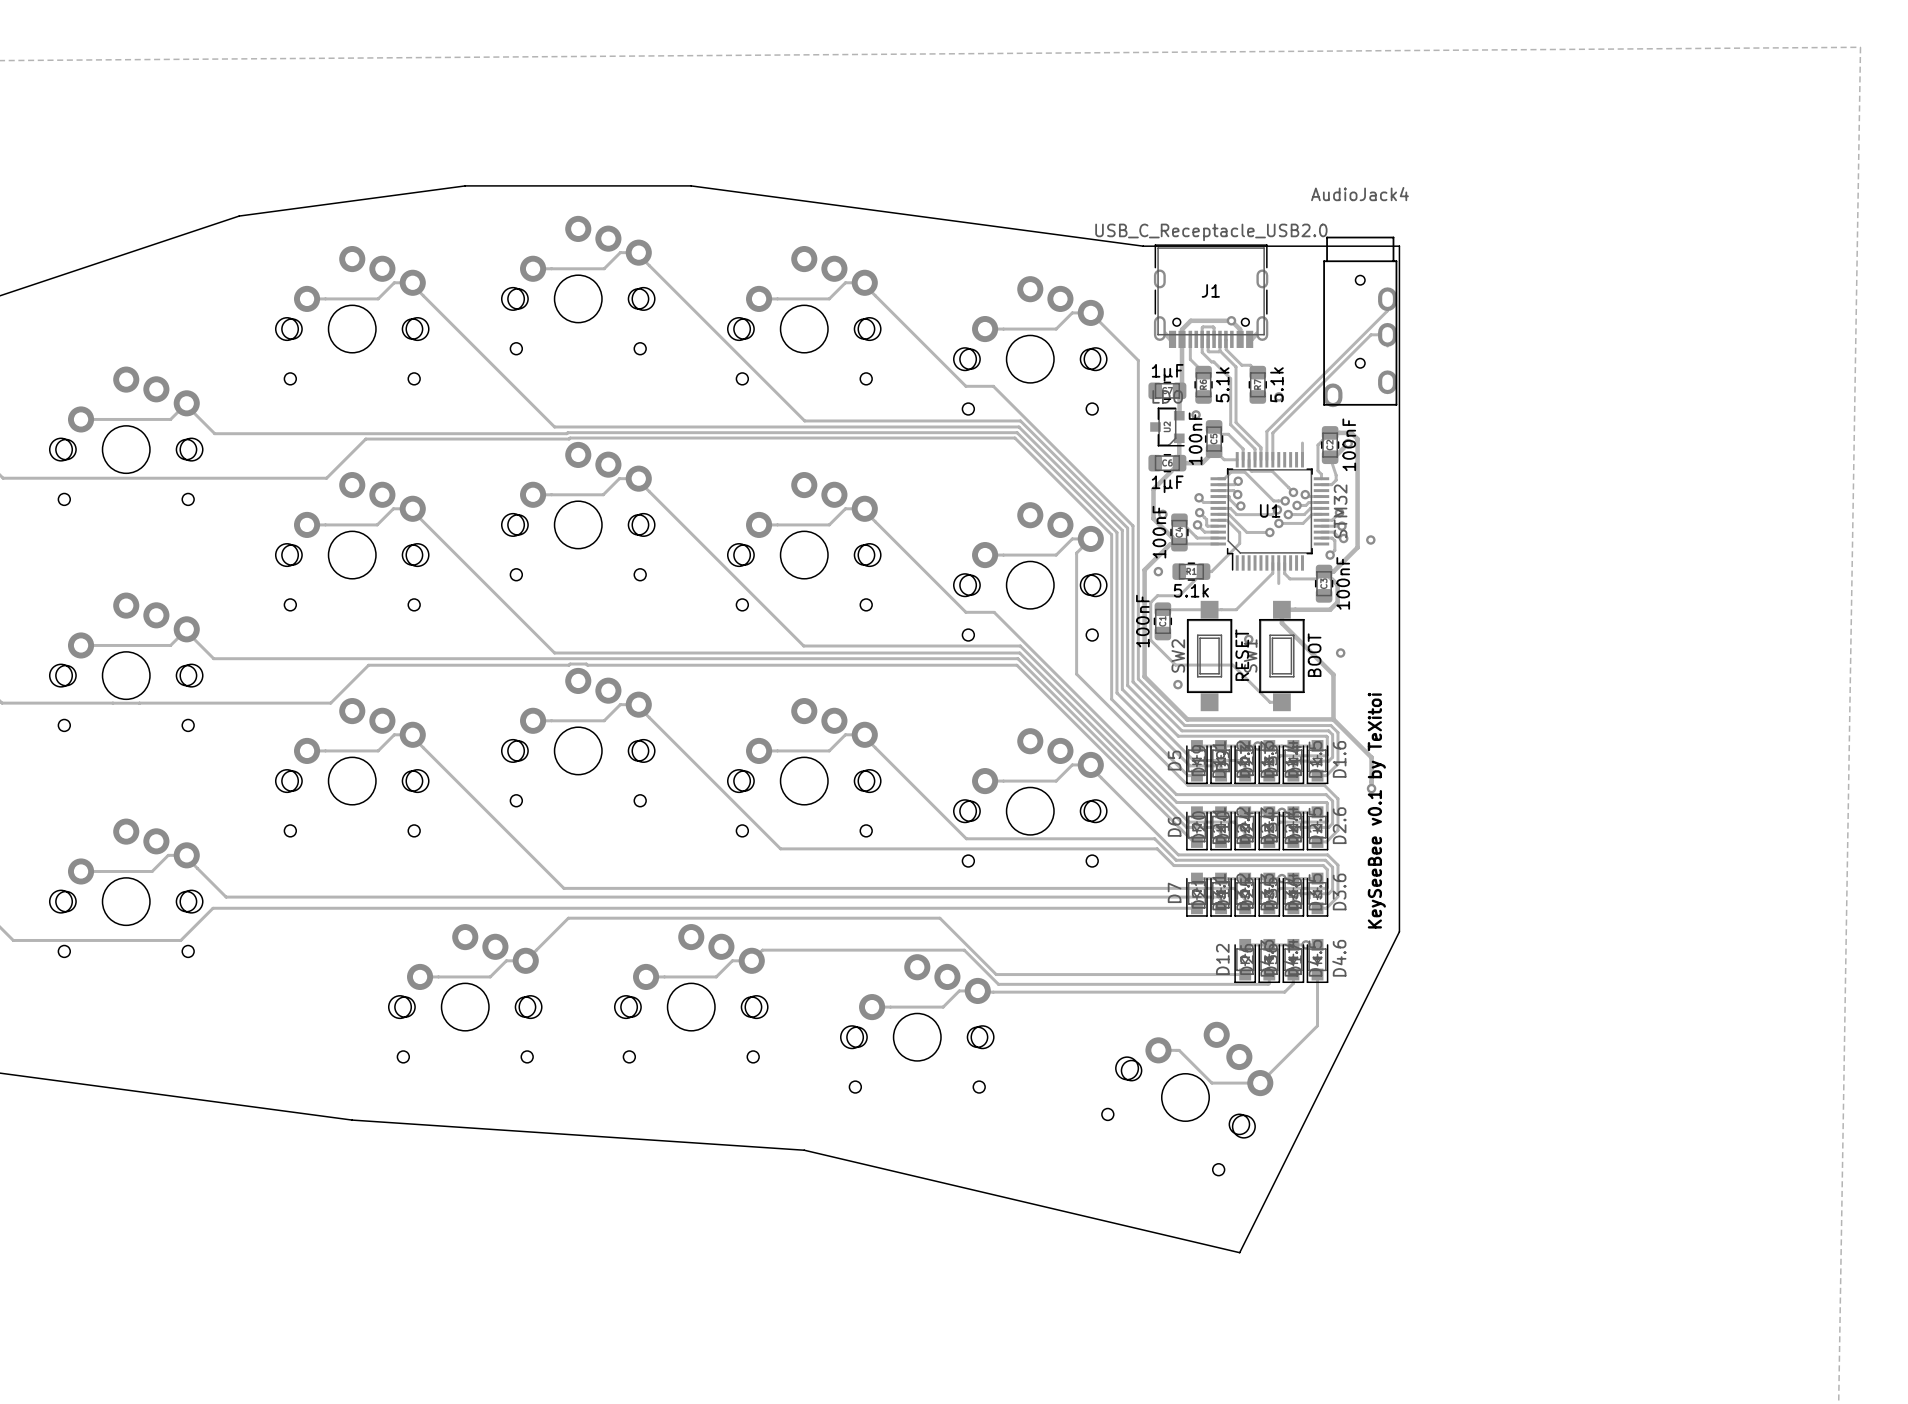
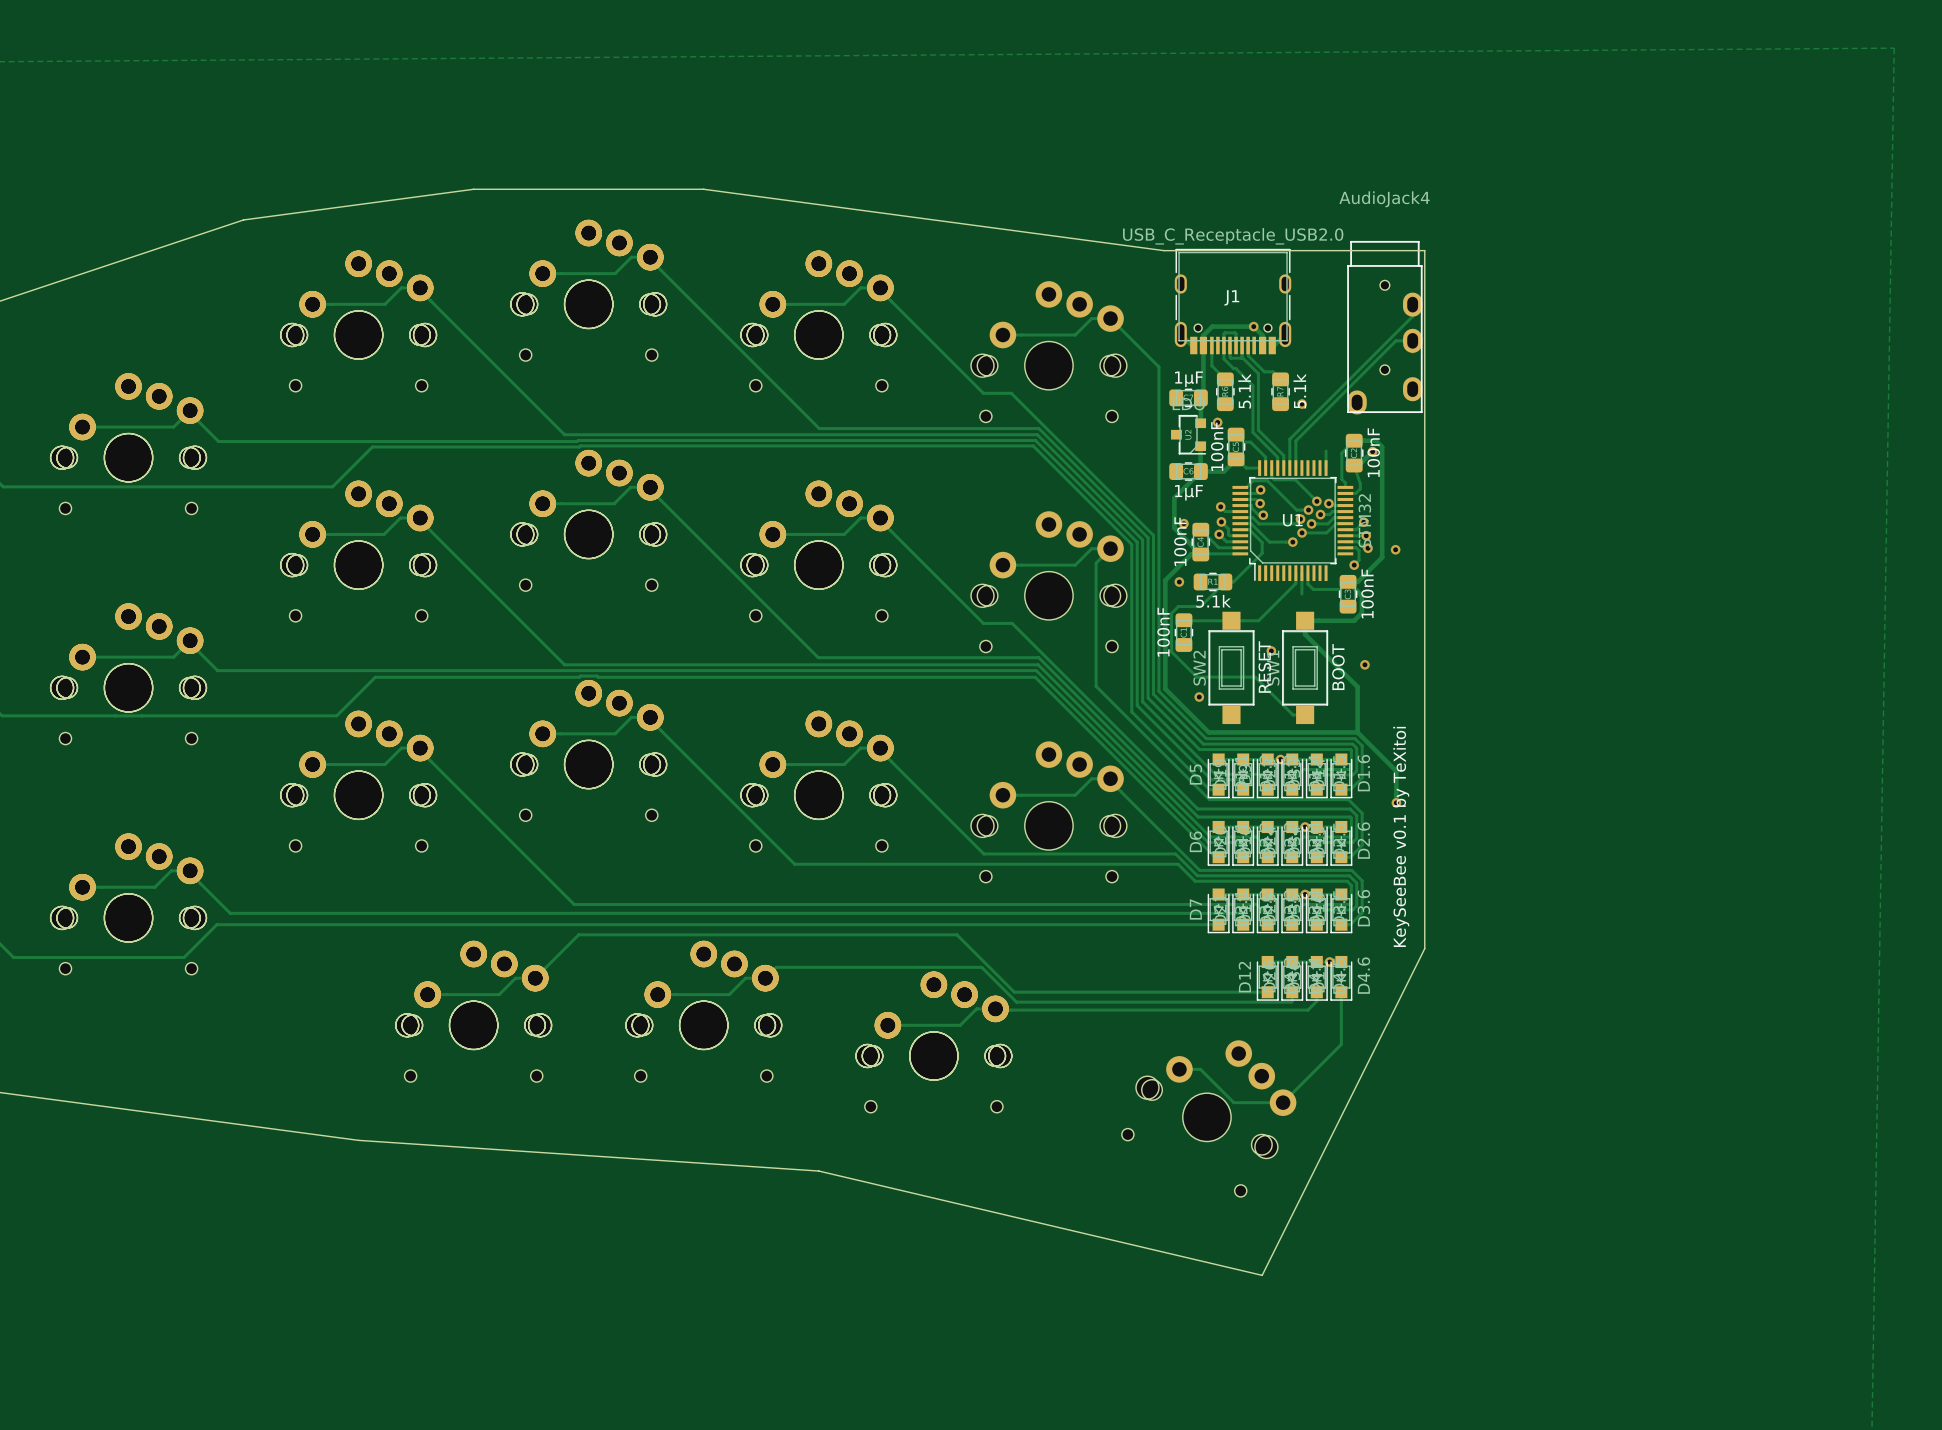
part: none -> (588, 274)
part: none -> (358, 304)
part: none -> (818, 304)
part: none -> (128, 427)
part: none -> (588, 504)
part: none -> (358, 534)
part: none -> (818, 534)
part: none -> (128, 657)
part: none -> (588, 734)
part: none -> (358, 765)
part: none -> (818, 765)
part: none -> (128, 887)
part: none -> (473, 995)
part: none -> (703, 995)
part: none -> (933, 1025)

